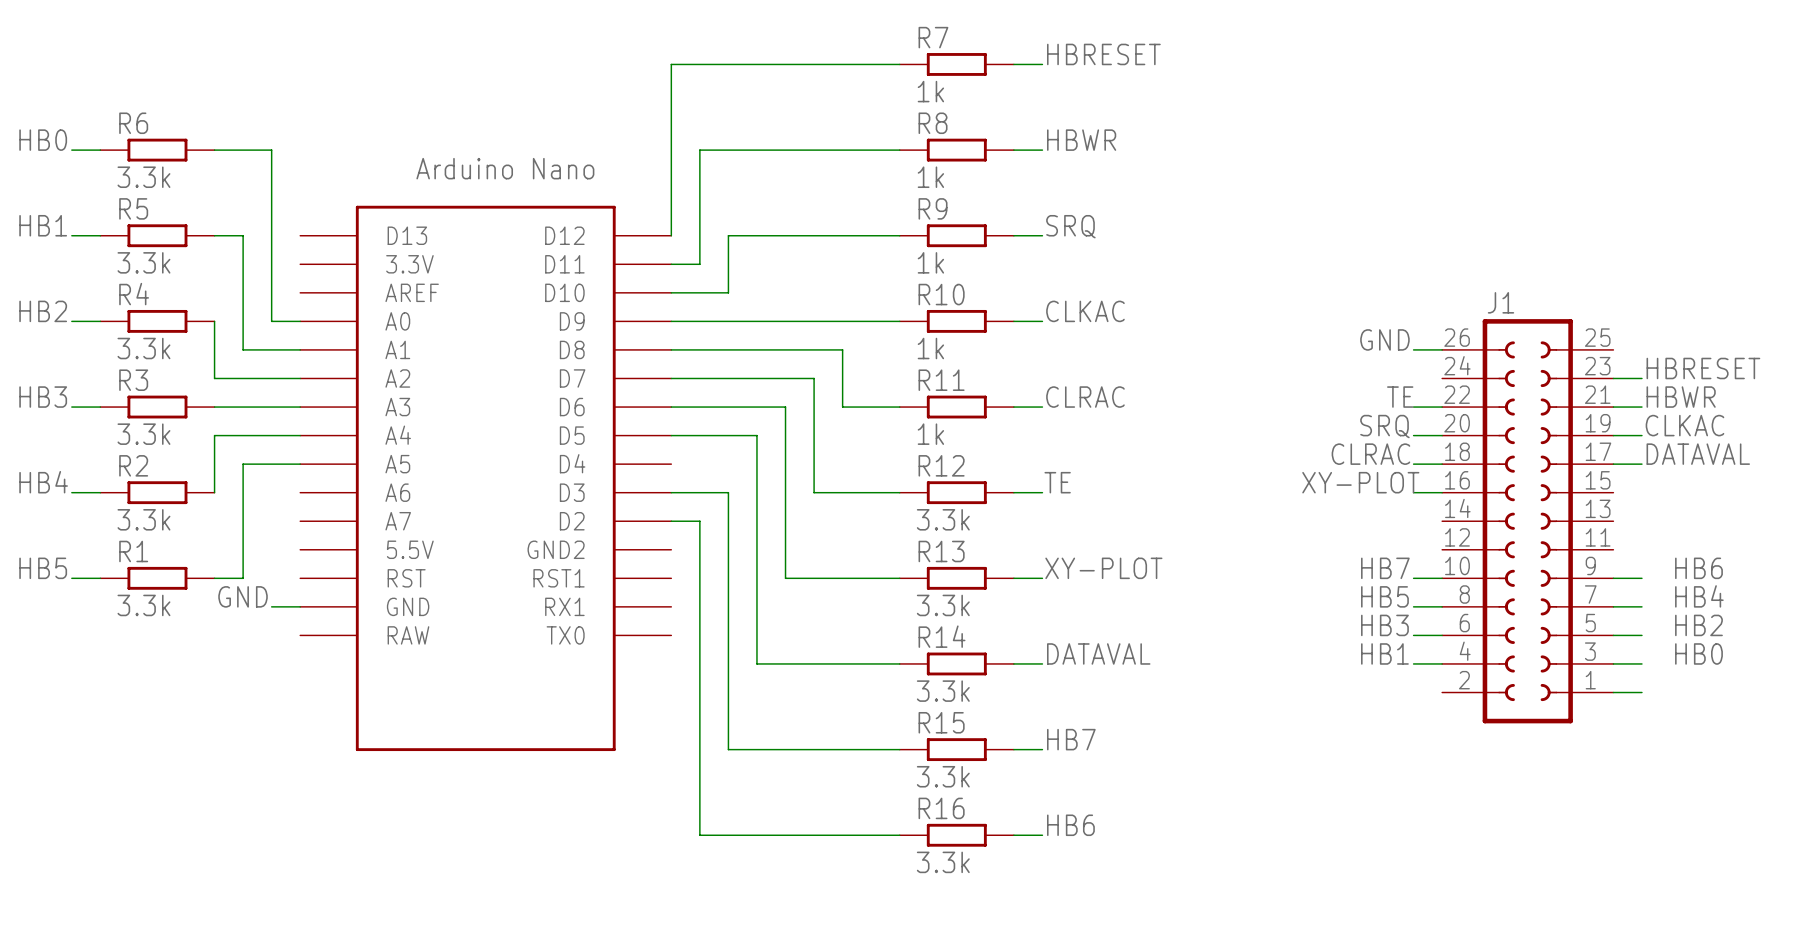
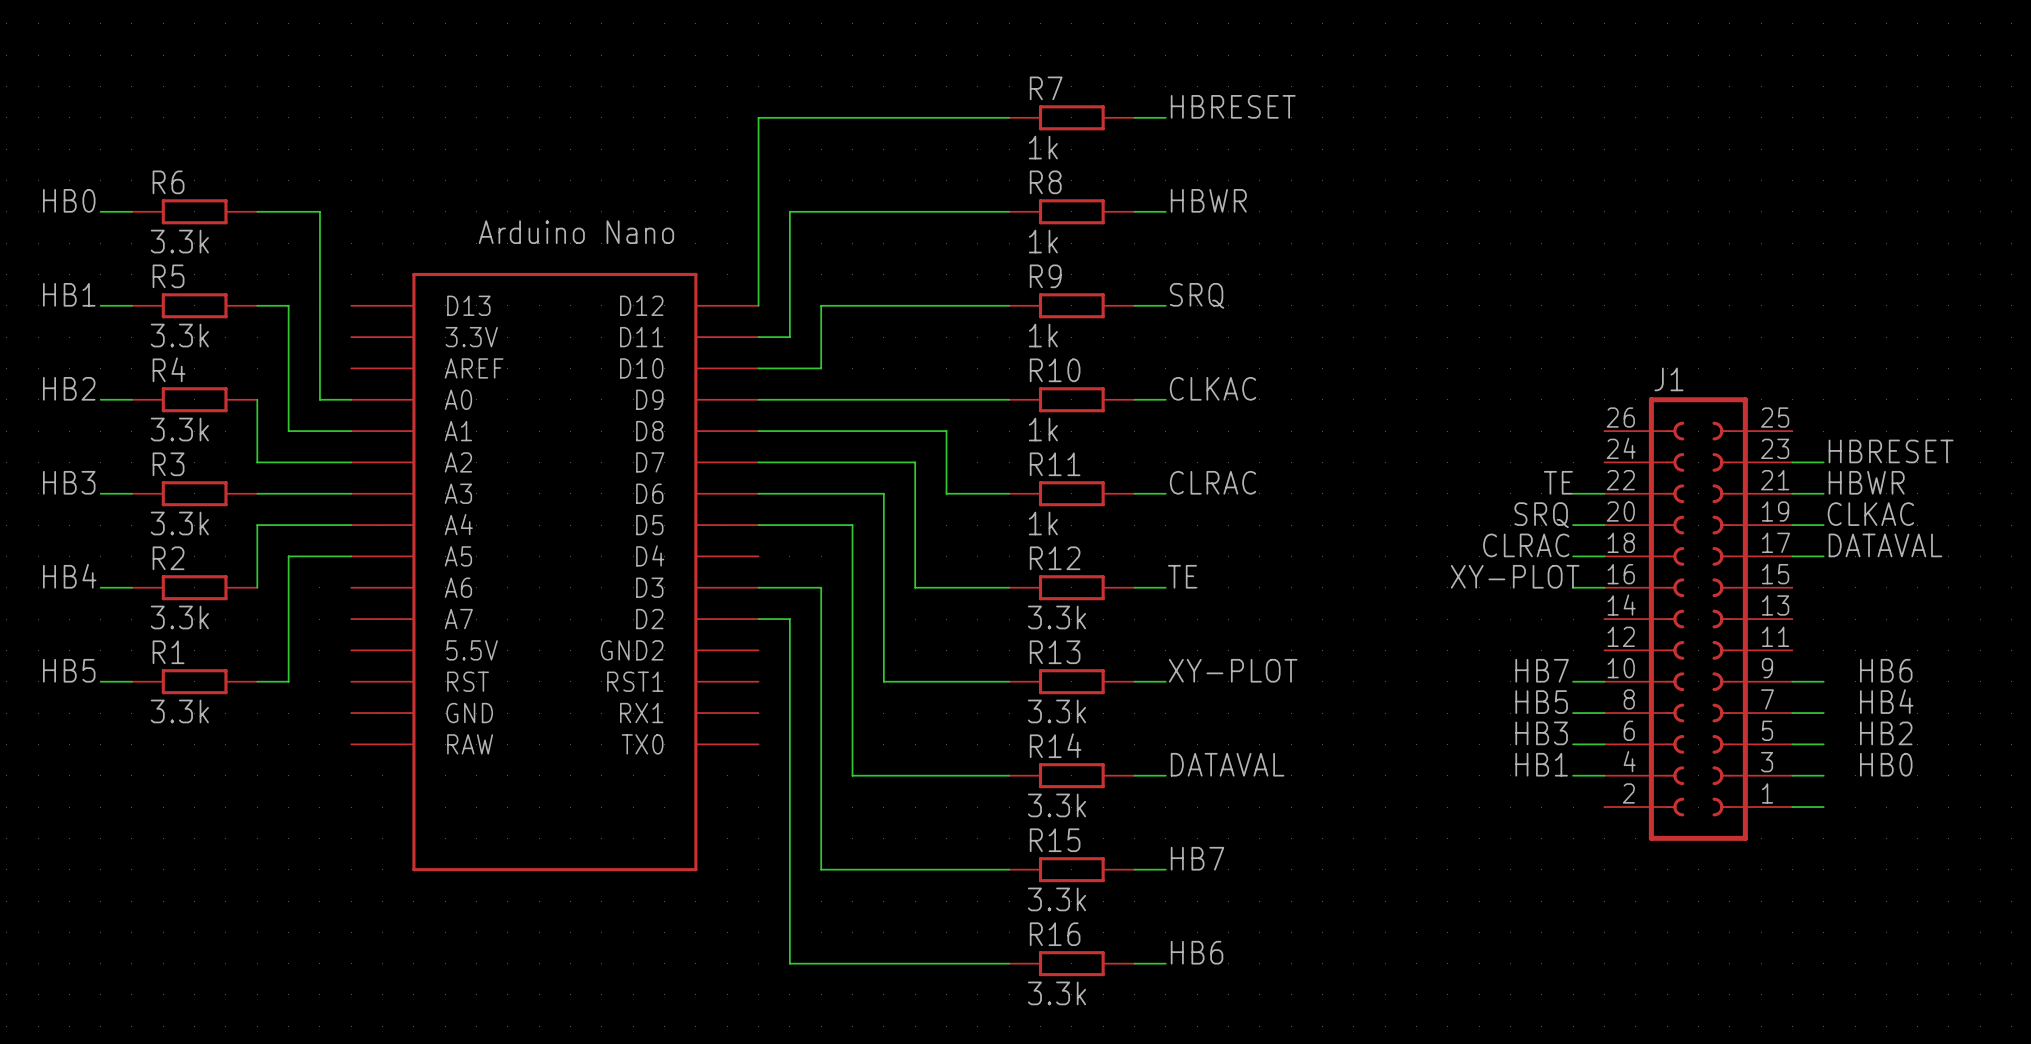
label: GND (1384, 339) -> none
wire: (1413, 349) (1442, 349) -> none
label: GND (243, 596) -> none
wire: (271, 606) (300, 606) -> none

